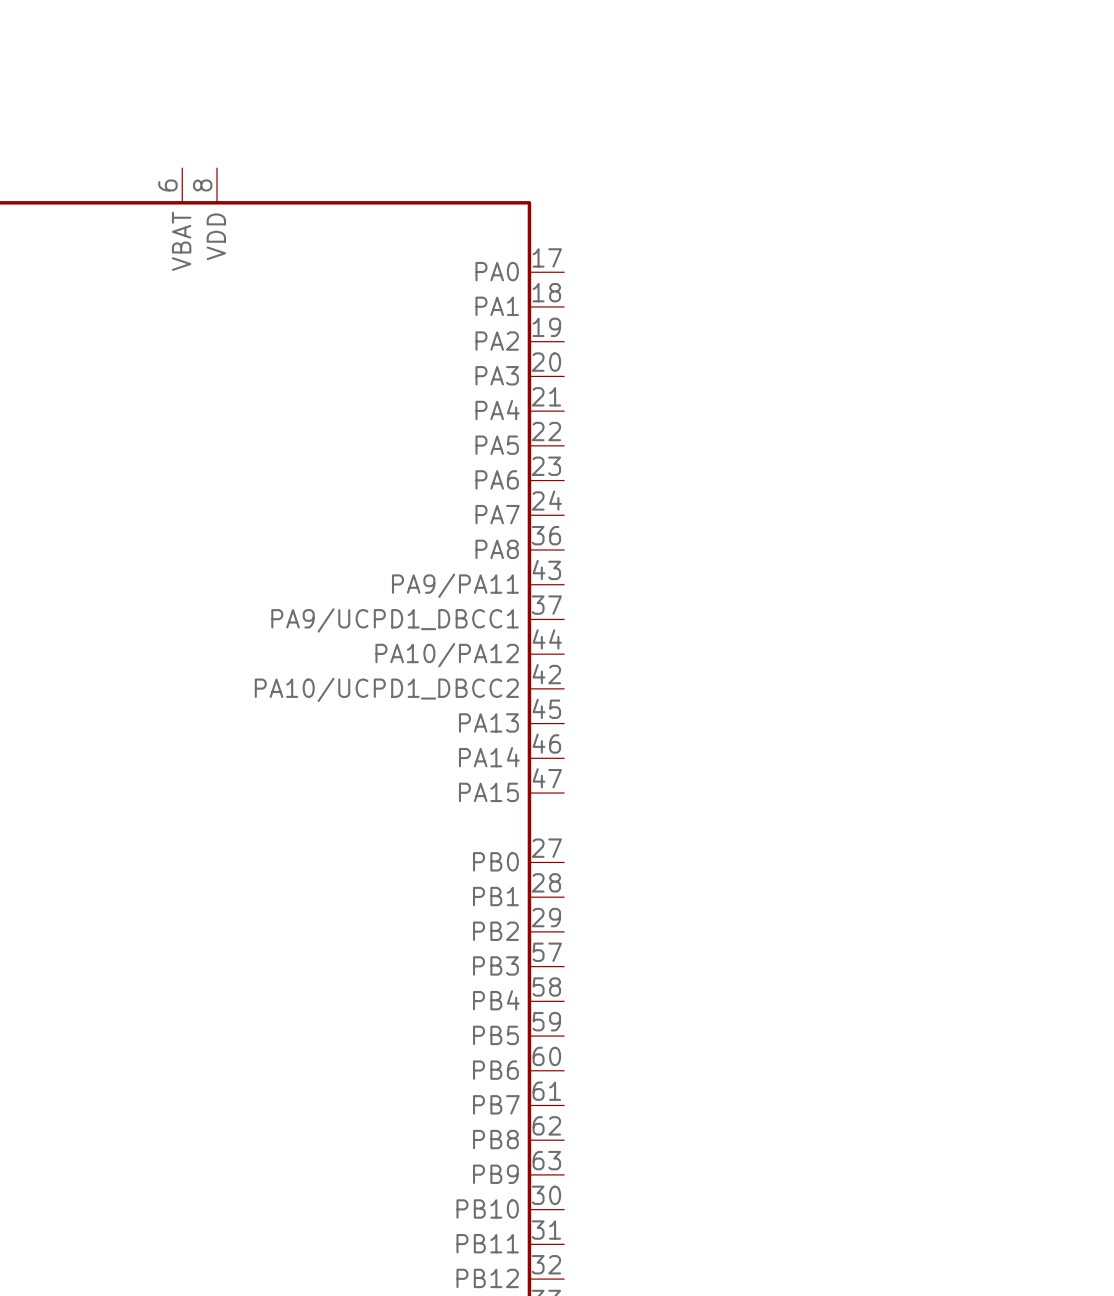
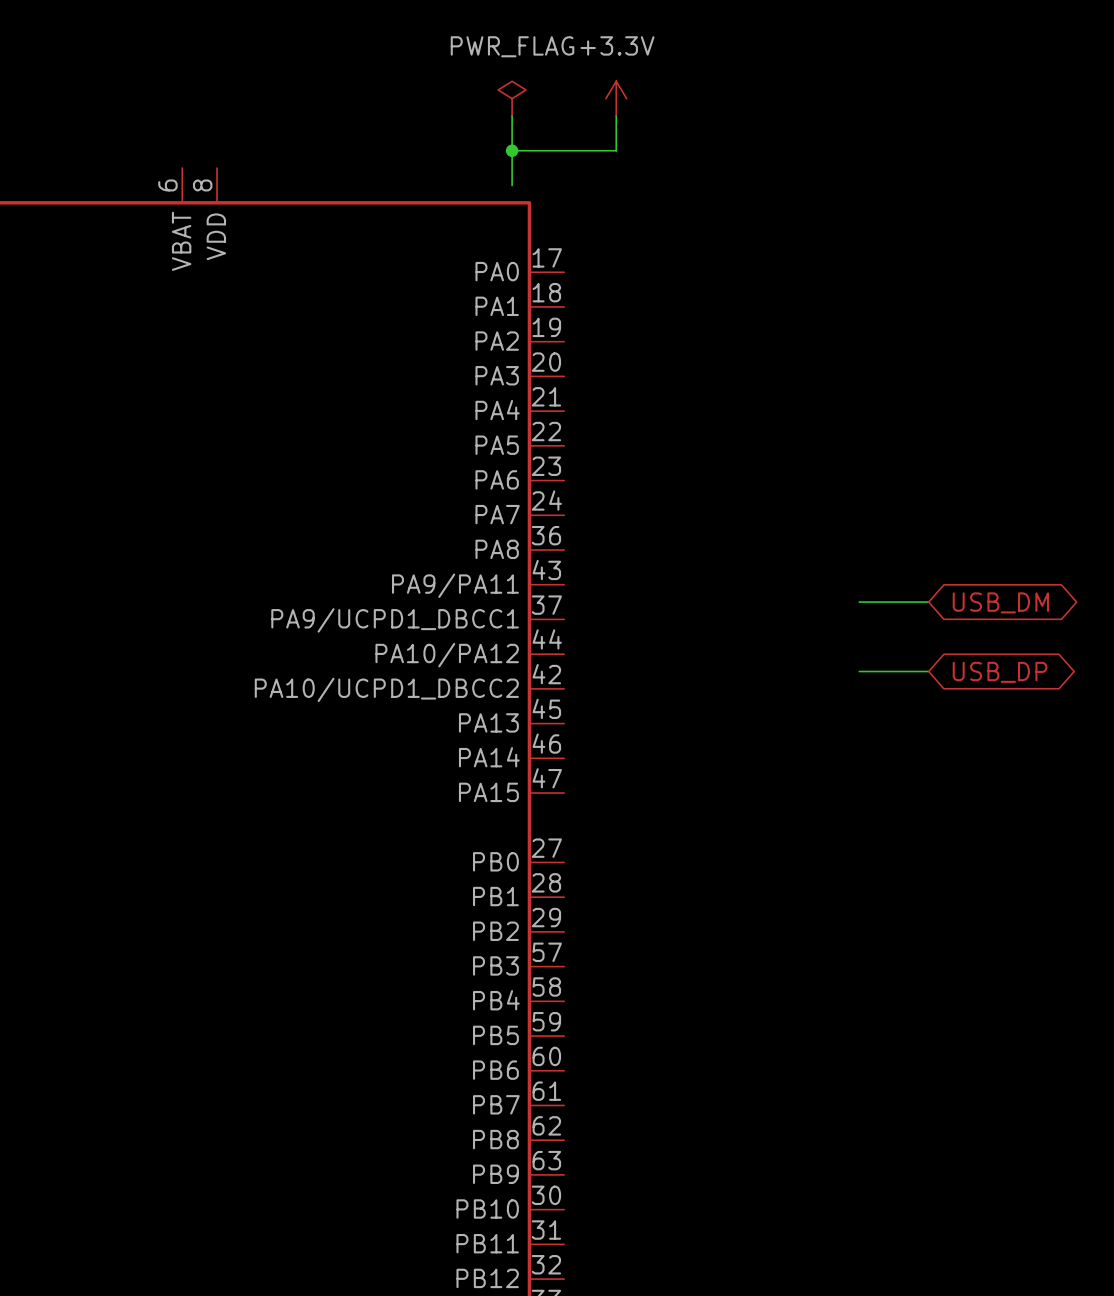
power symbol: none -> PWR_FLAG (512, 98)
power symbol: none -> +3.3V (616, 98)
wire: none -> (512, 116) (512, 185)
wire: none -> (616, 116) (616, 150) (512, 150)
junction: none -> (512, 150)
wire: none -> (859, 602) (928, 602)
global label: none -> USB_DM (1000, 602)
wire: none -> (859, 671) (928, 671)
global label: none -> USB_DP (1000, 672)

